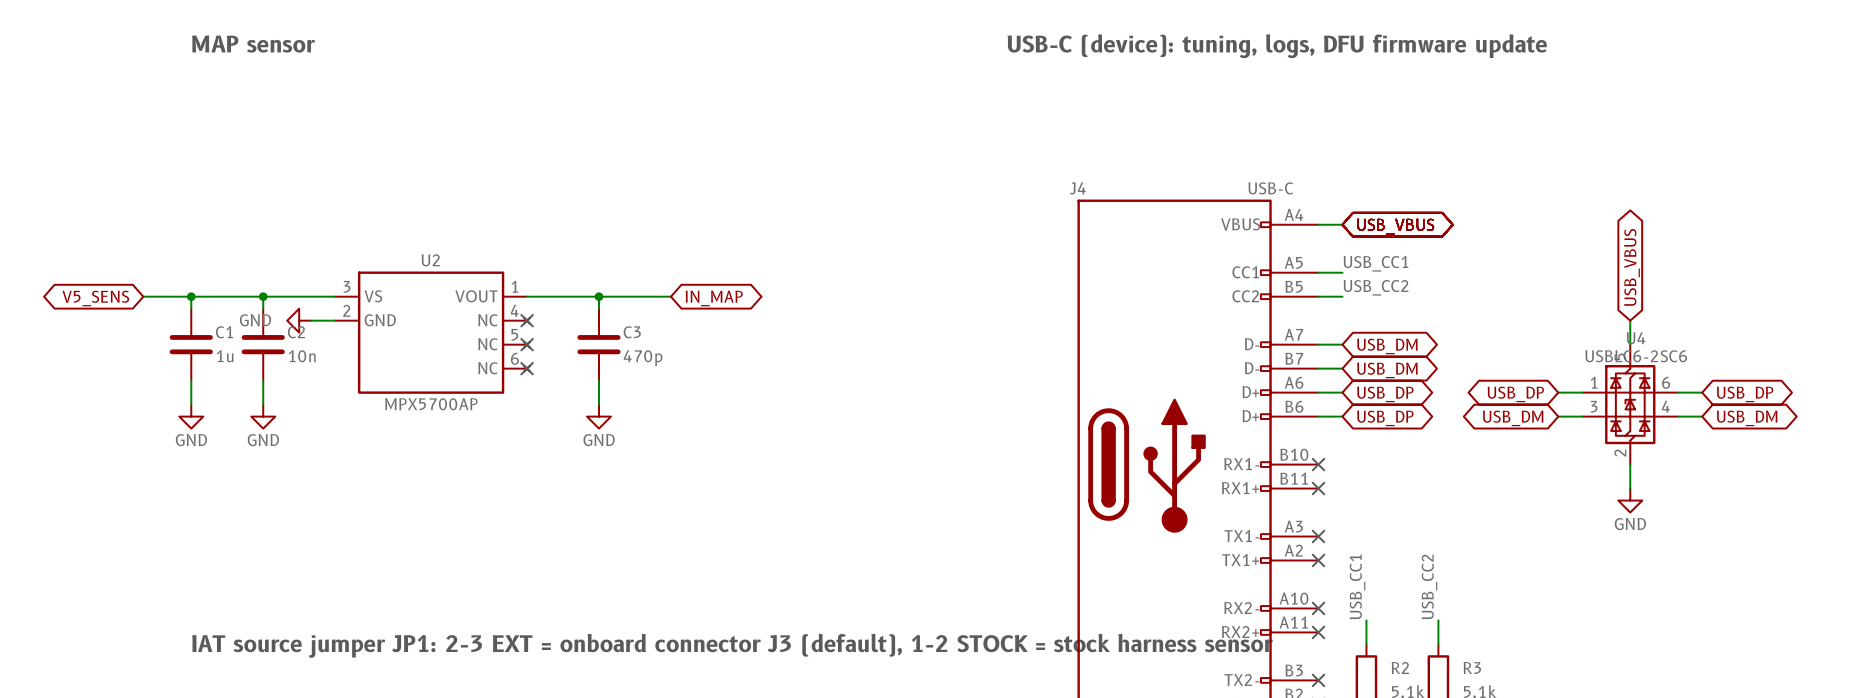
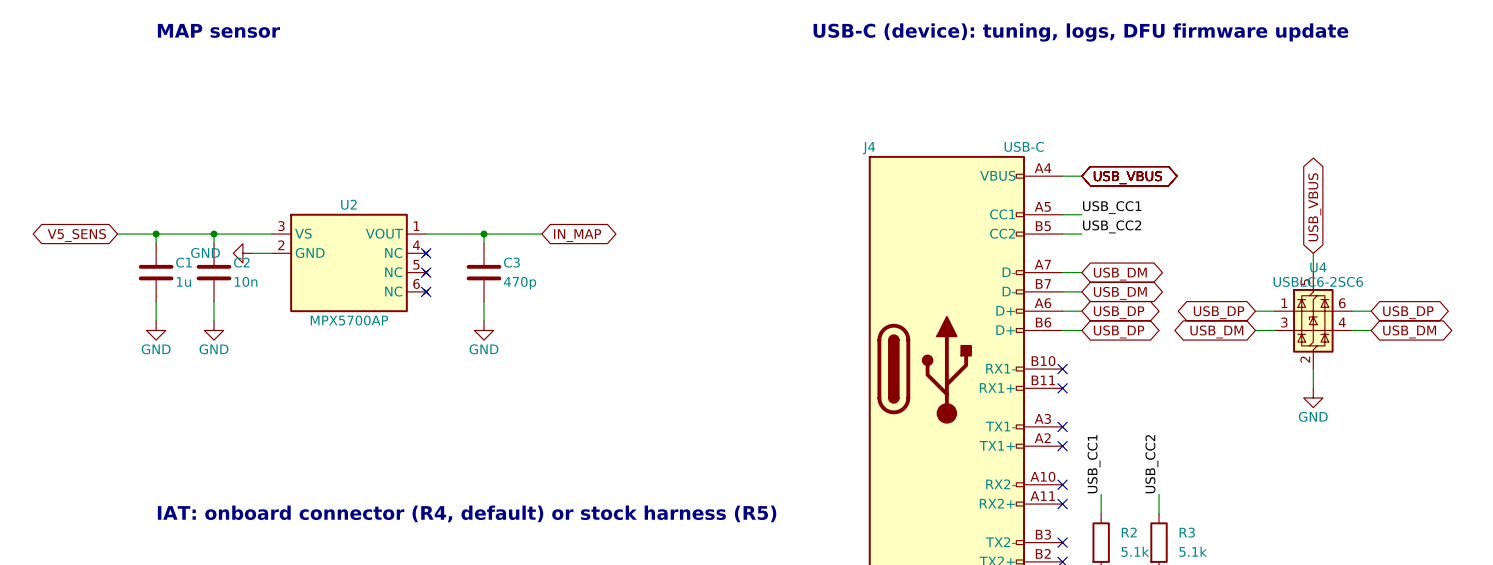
text: IAT source jumper JP1: 2-3 EXT = onboard connector J3 (default), 1-2 STOCK = stock harness sensor (732, 645) -> IAT: onboard connector (R4, default) or stock harness (R5) (467, 513)

